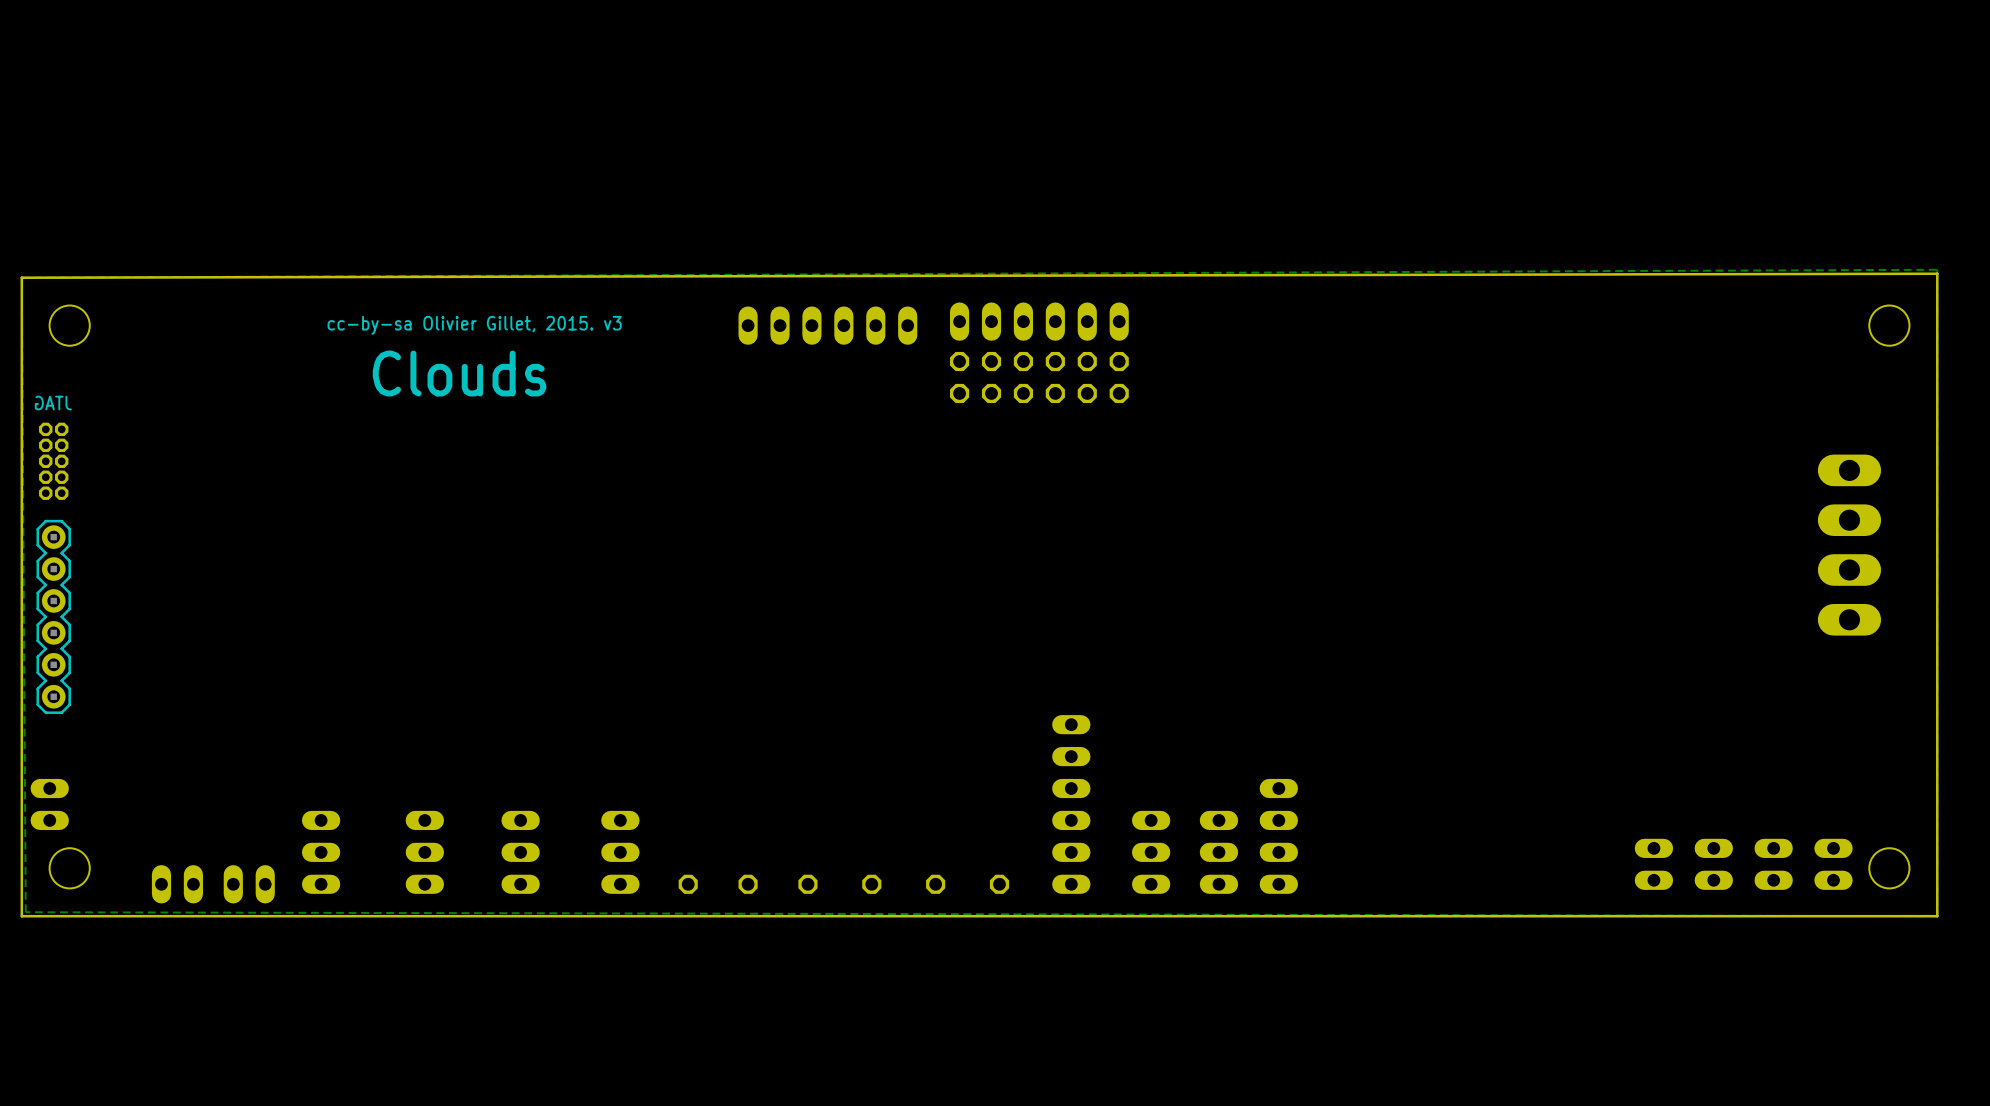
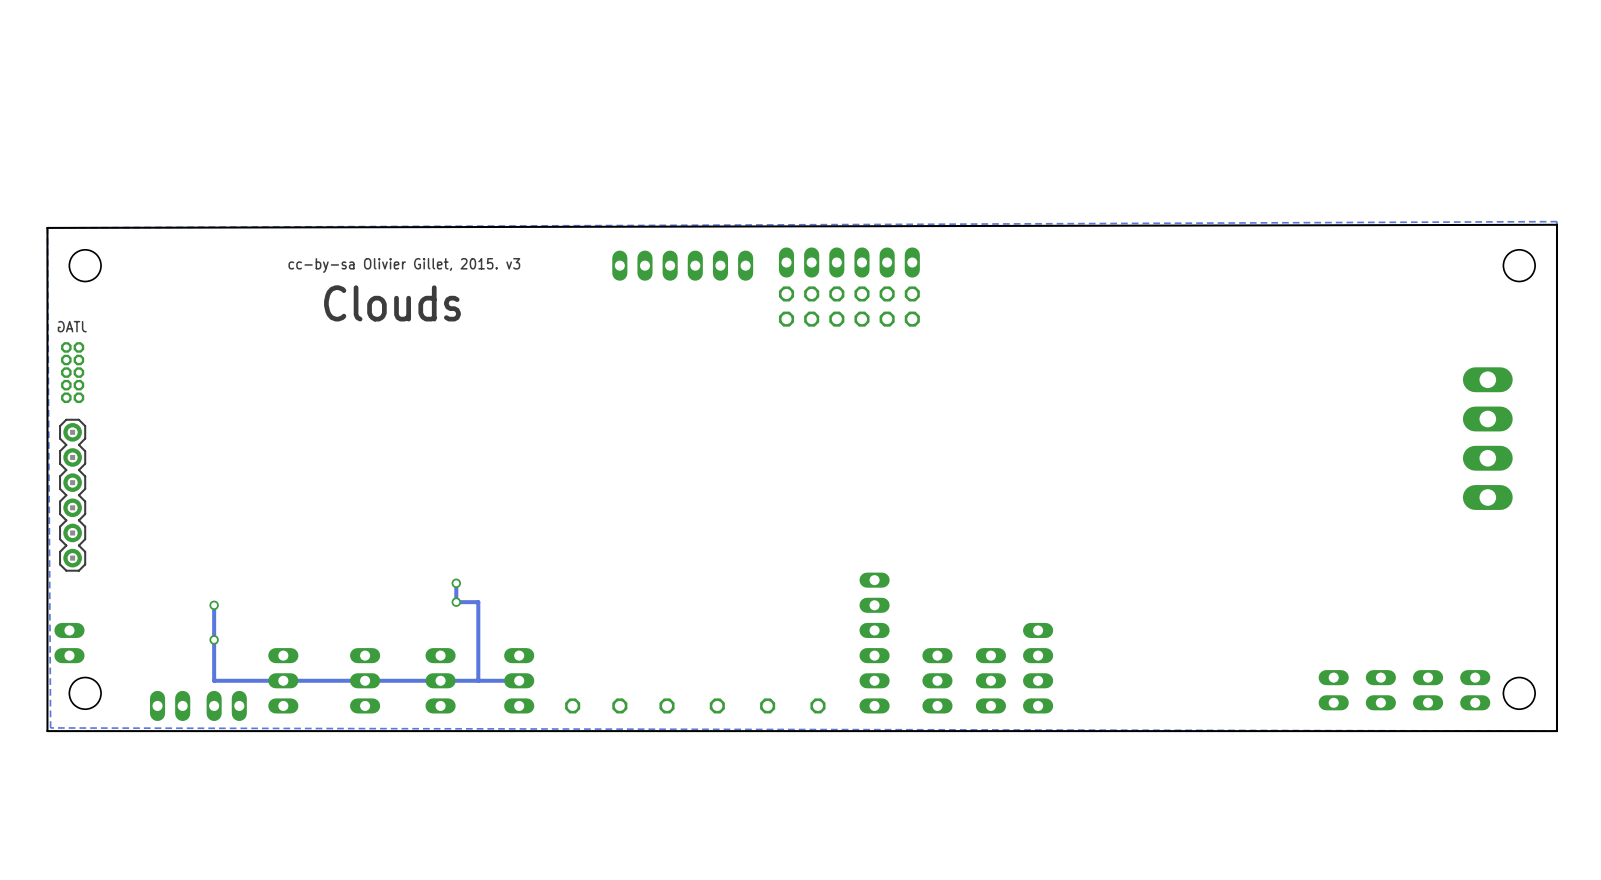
track: none -> (456, 583) (456, 602) (478, 602) (478, 680)
via: none -> (456, 583)
via: none -> (456, 602)
track: none -> (214, 605) (214, 680) (519, 680)
via: none -> (214, 605)
via: none -> (214, 639)

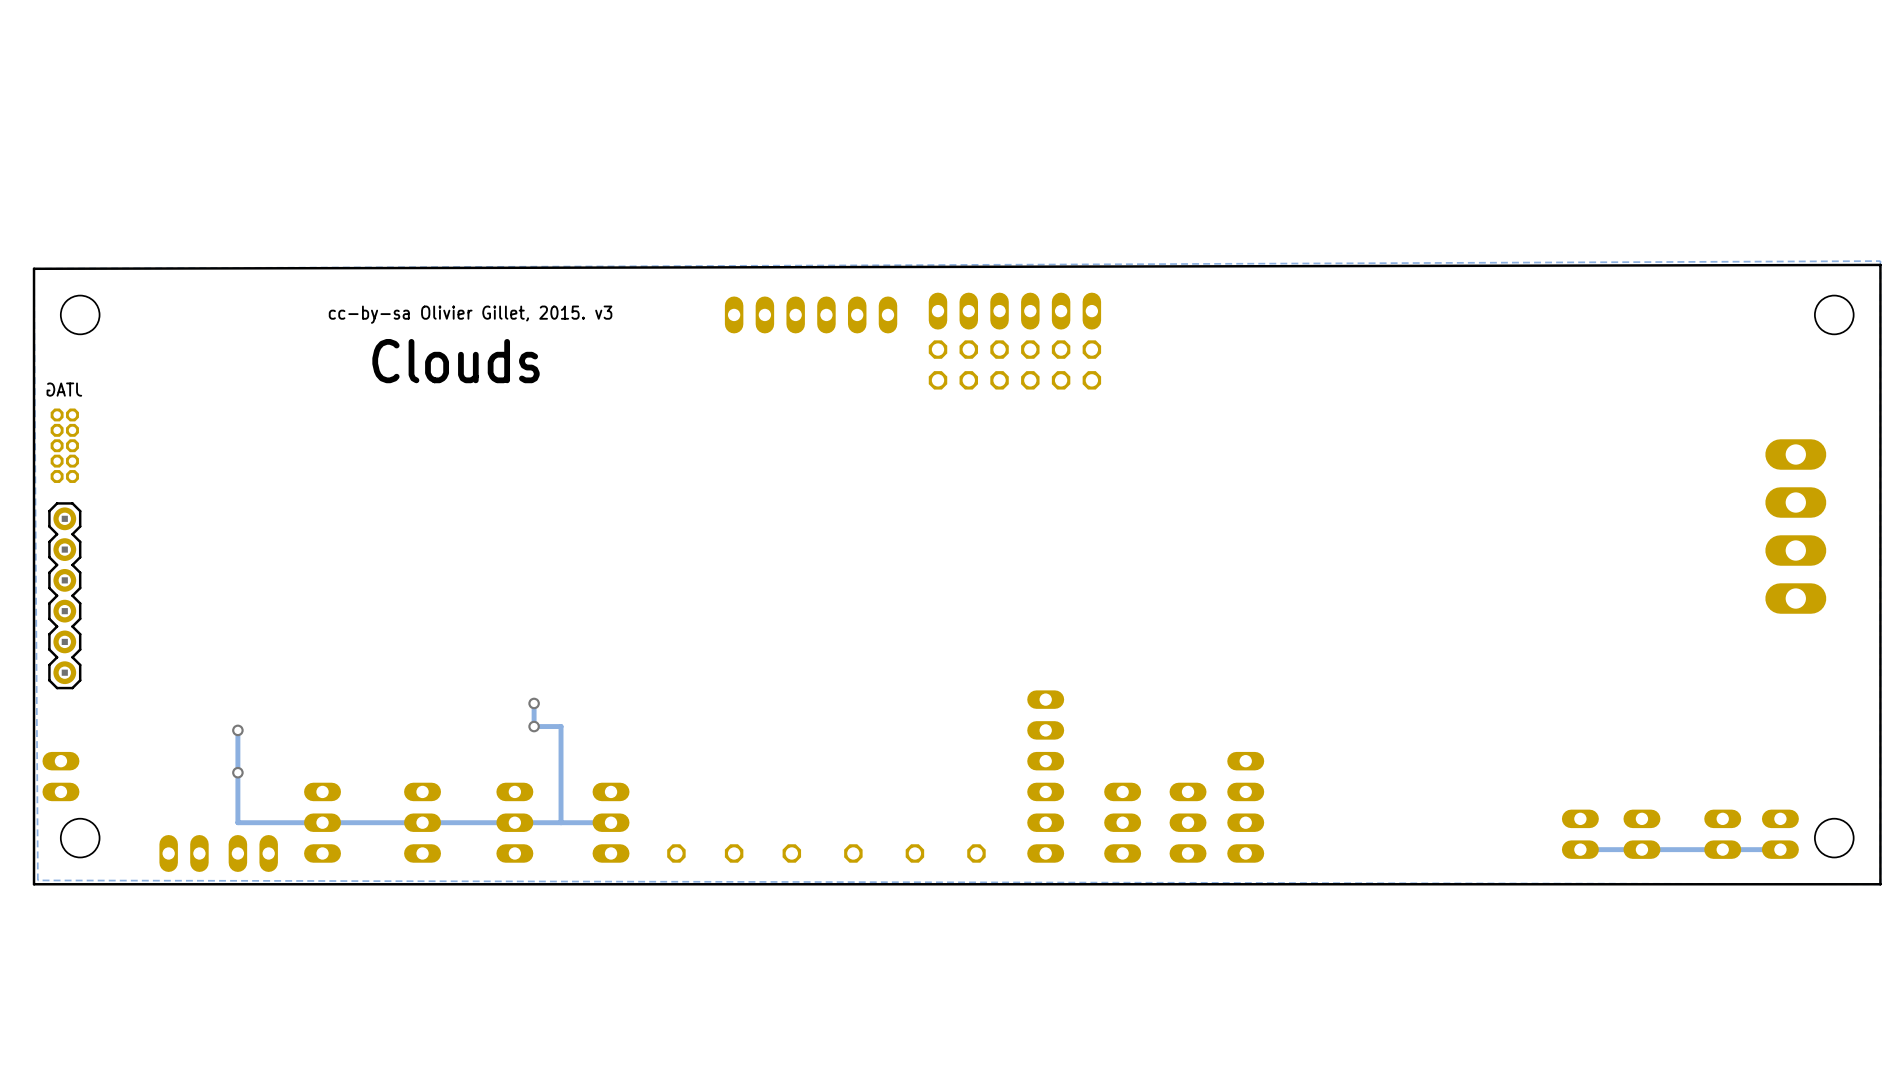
part: none -> (1580, 834)
part: (1333, 690) -> none
part: none -> (1641, 834)
part: (1380, 690) -> none
track: none -> (1780, 849) (1580, 849)

